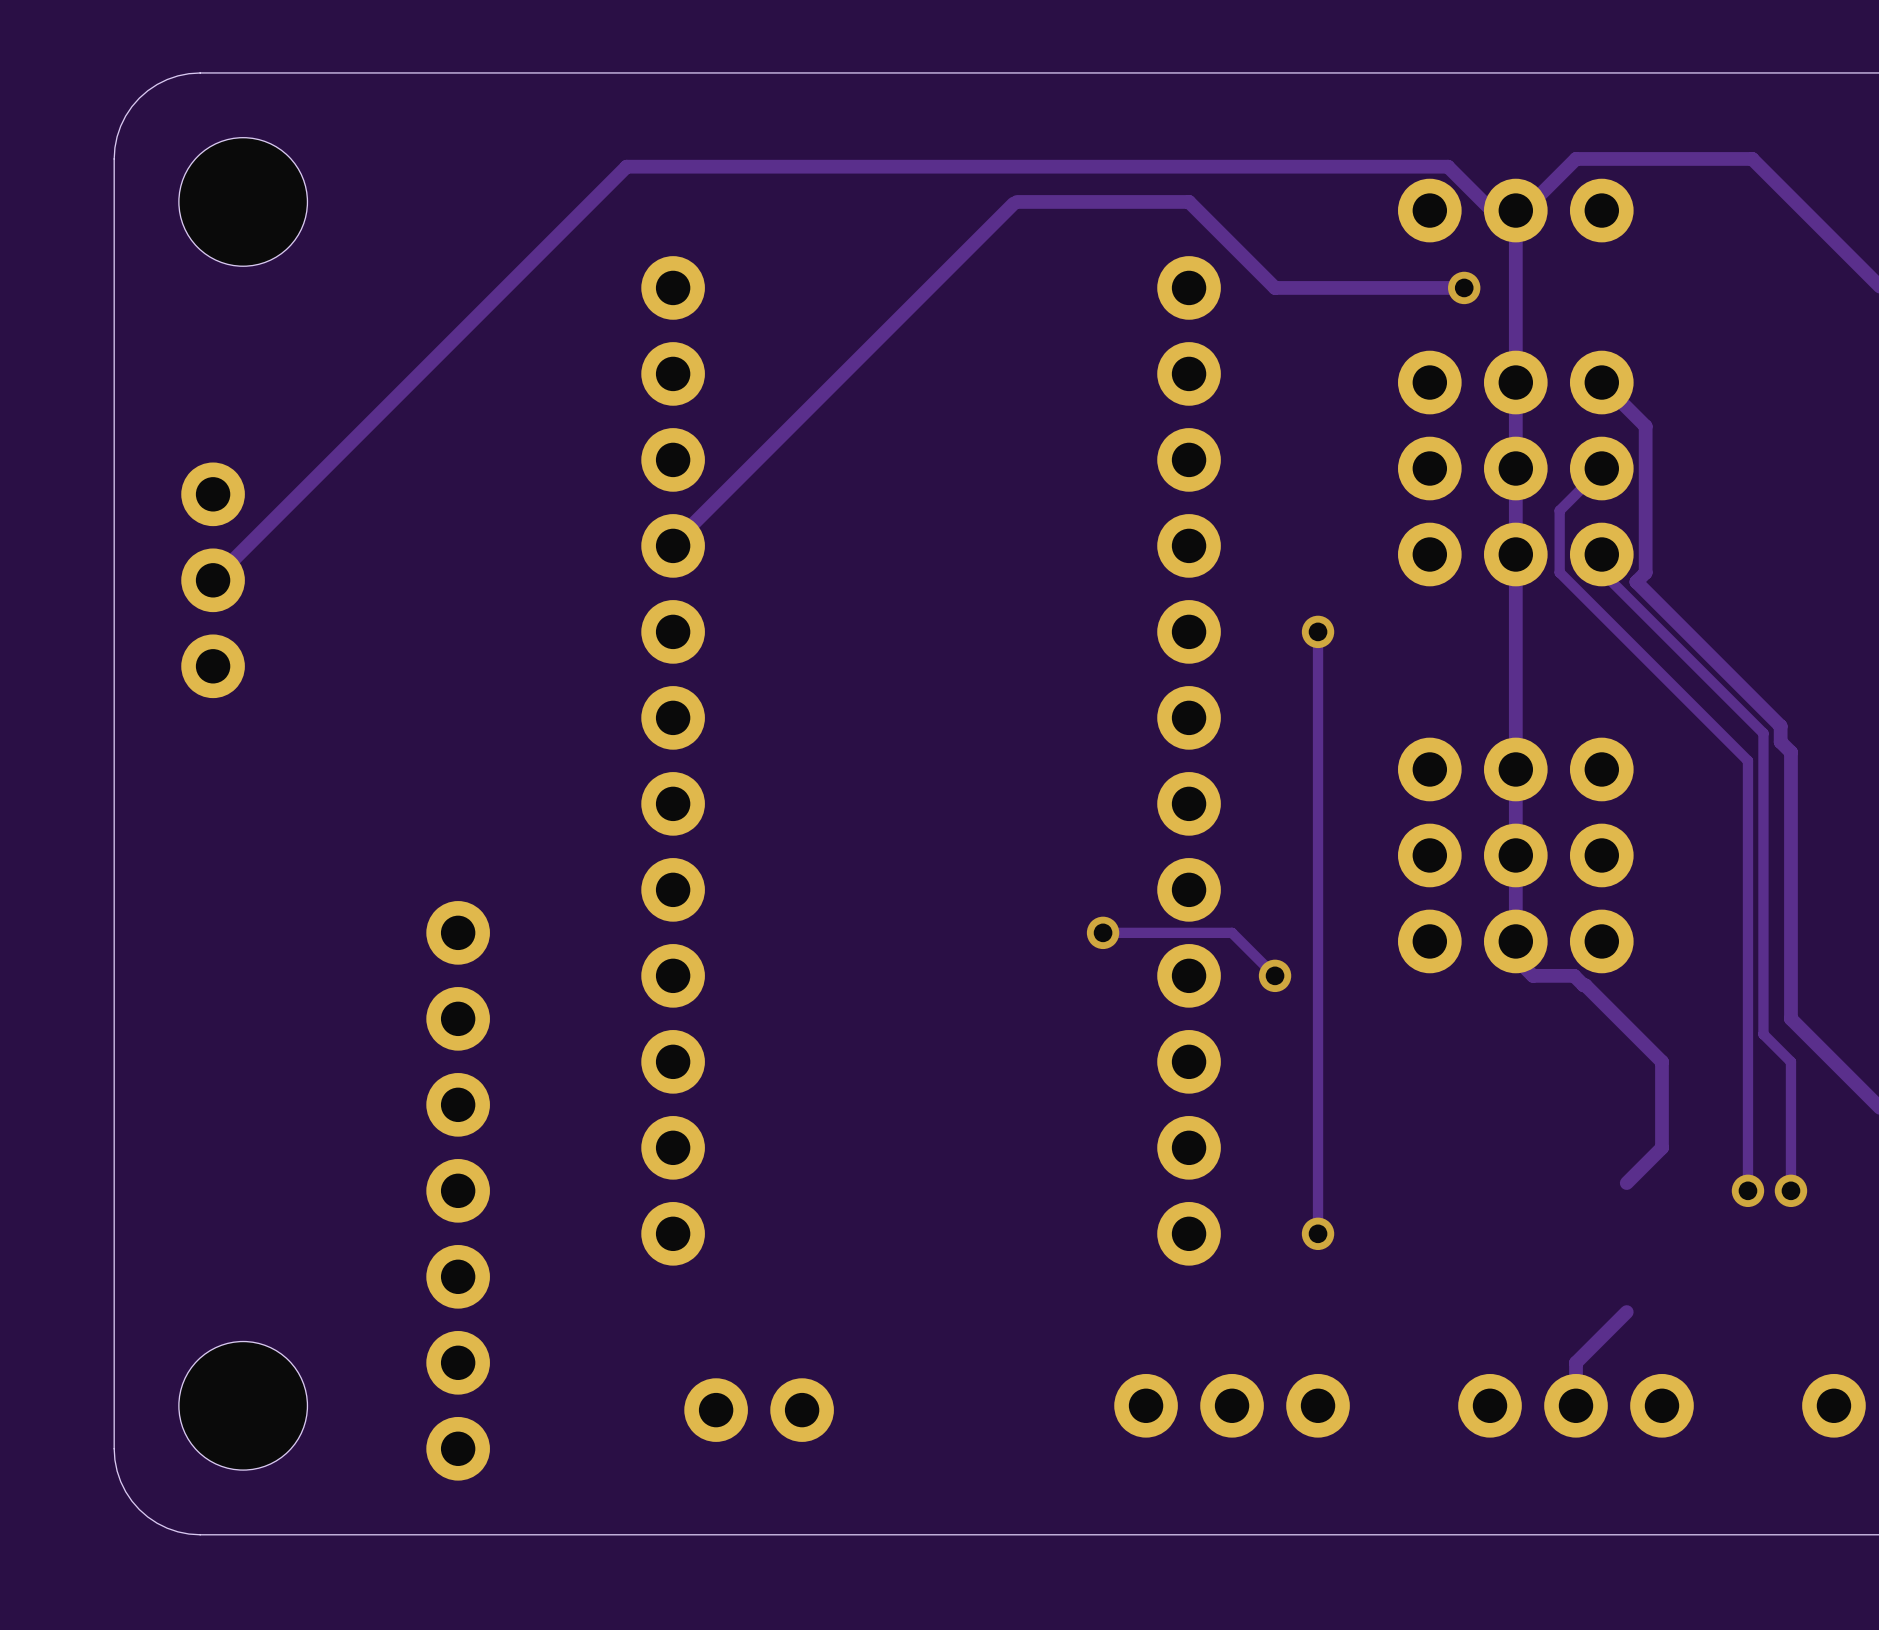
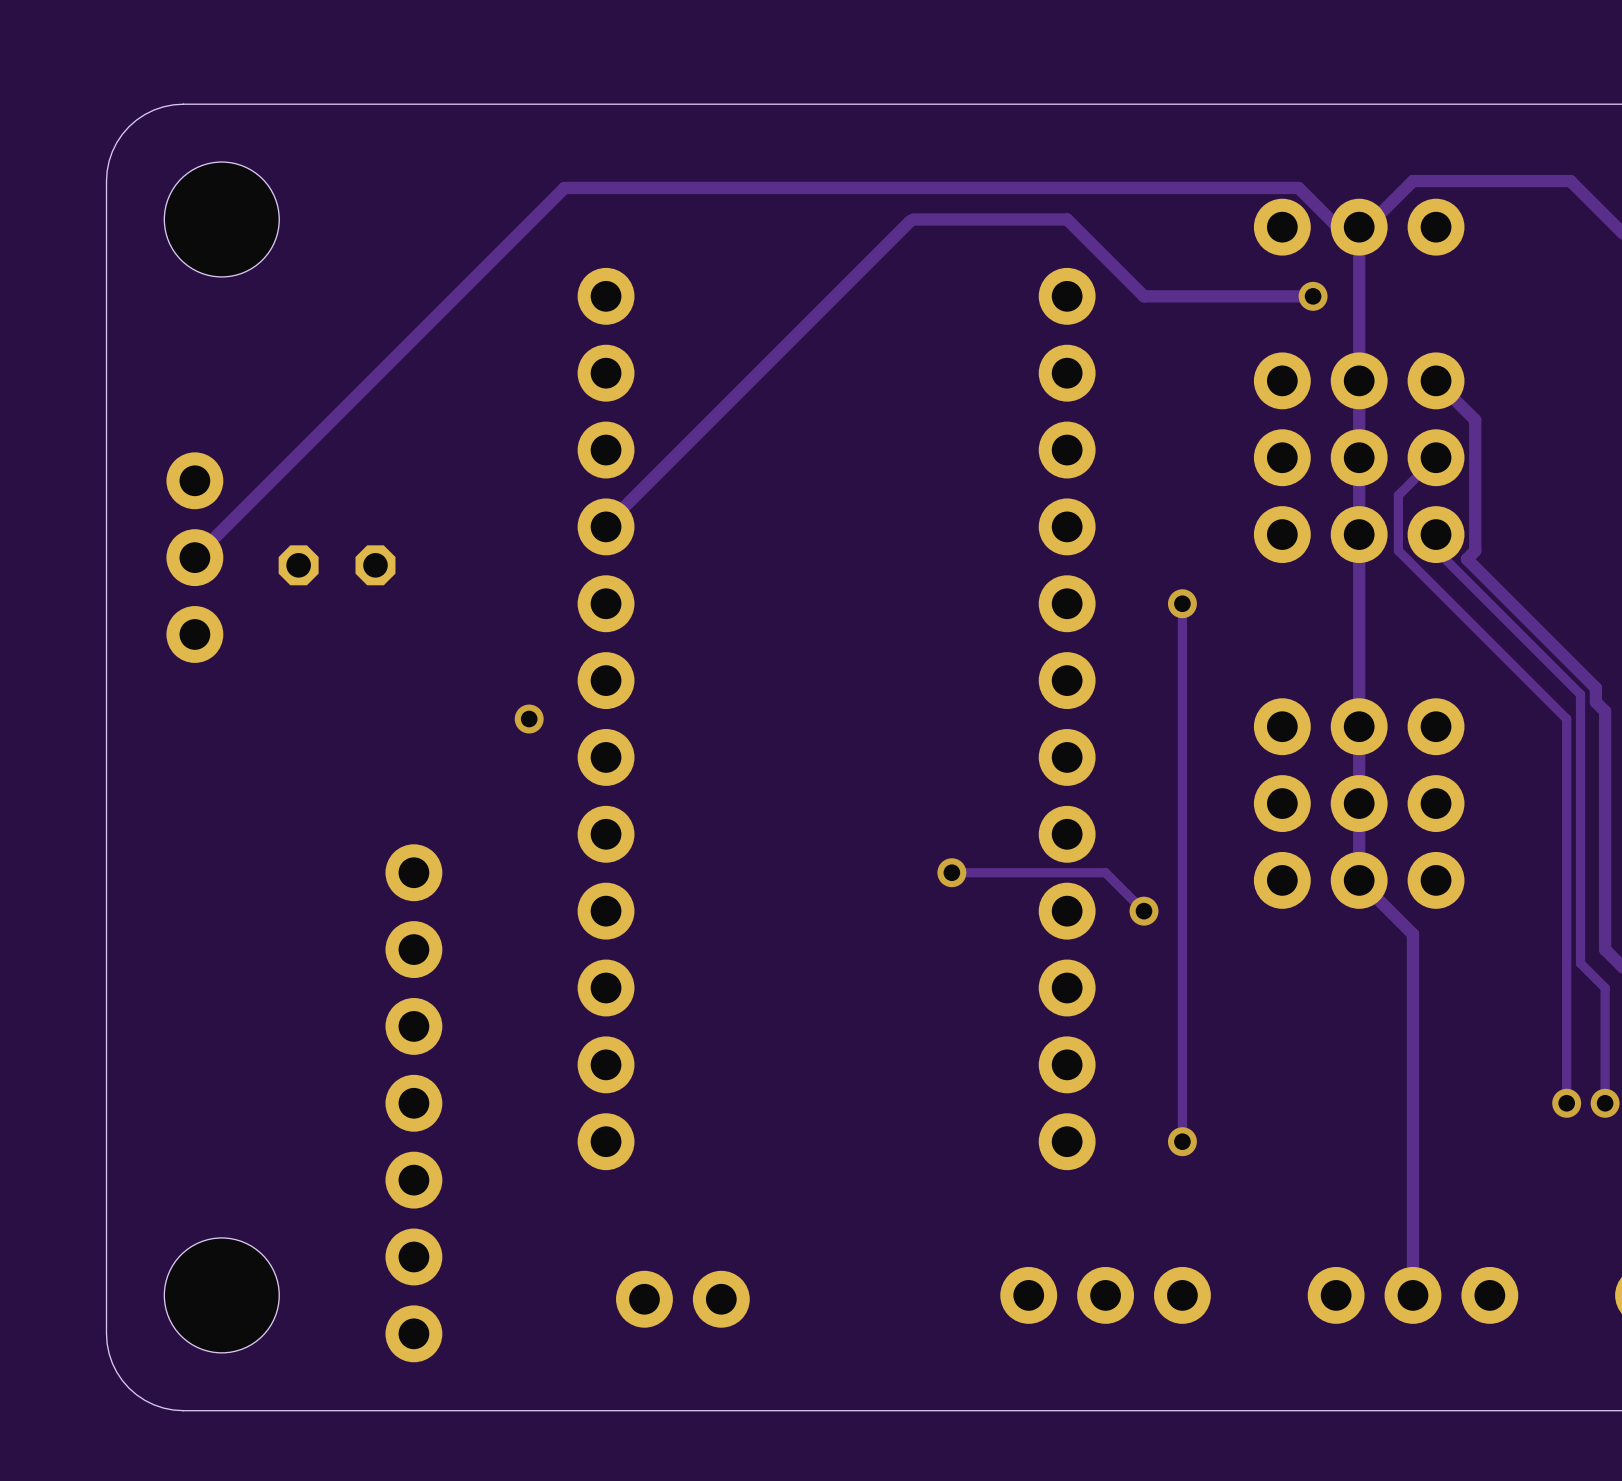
part: none -> (337, 565)
via: none -> (529, 719)
track: none -> (990, 872) (951, 872)
via position: (1103, 932) -> (951, 872)
track: (1515, 941) (1515, 958) (1533, 975) (1574, 975) (1661, 1061) (1661, 1147) (1626, 1183) -> (1359, 880) (1412, 934) (1412, 1256)
track: (1626, 1312) (1576, 1362) -> none

